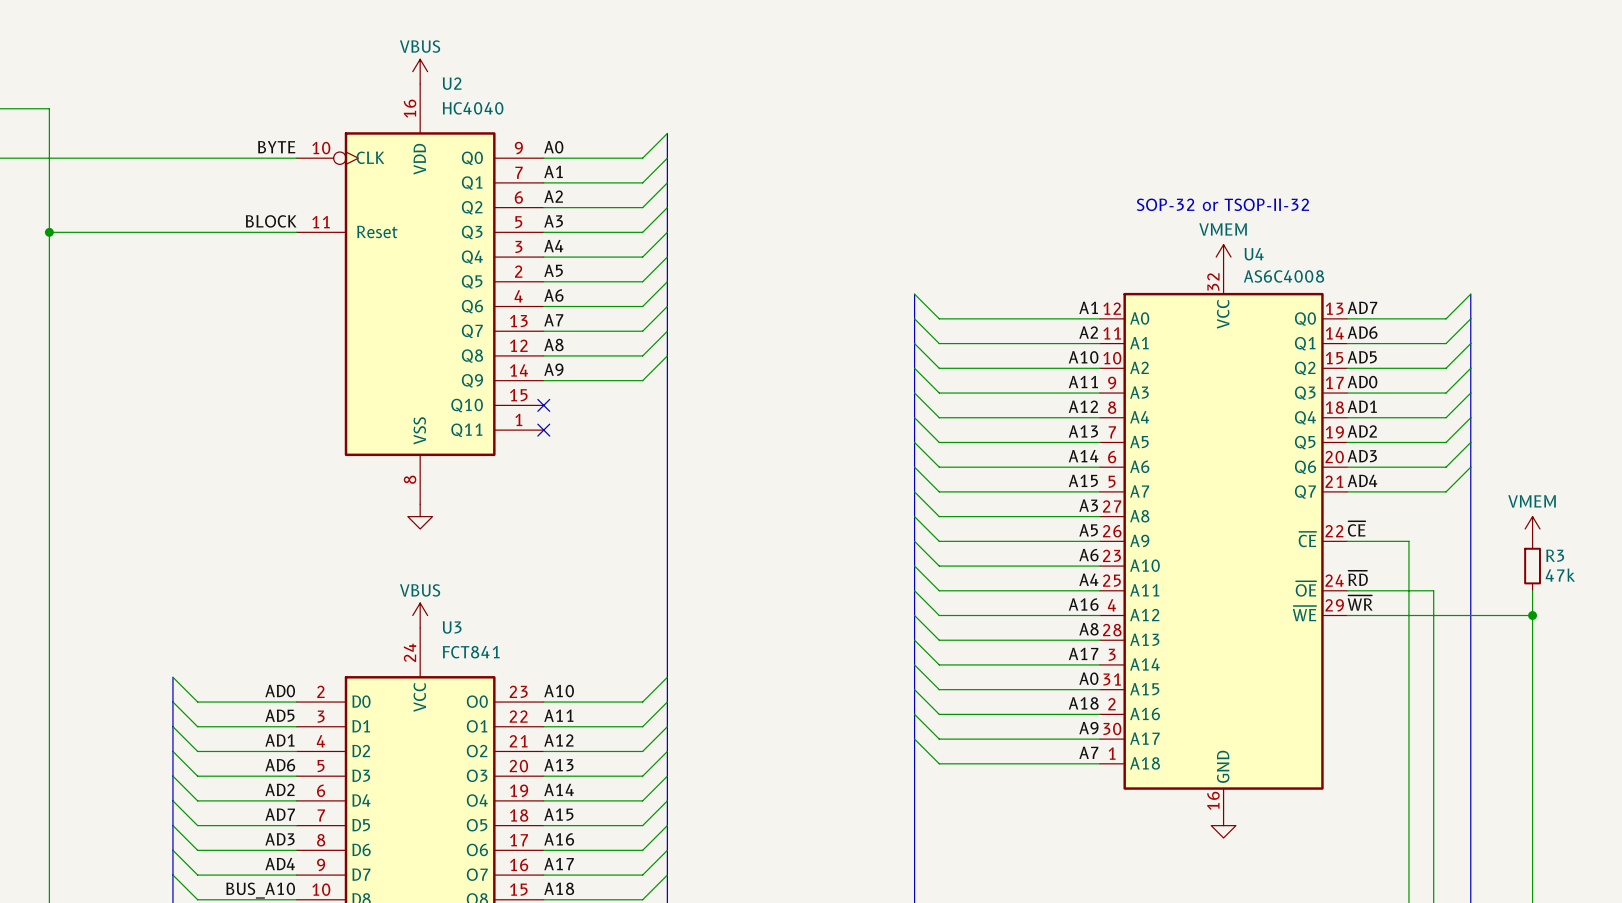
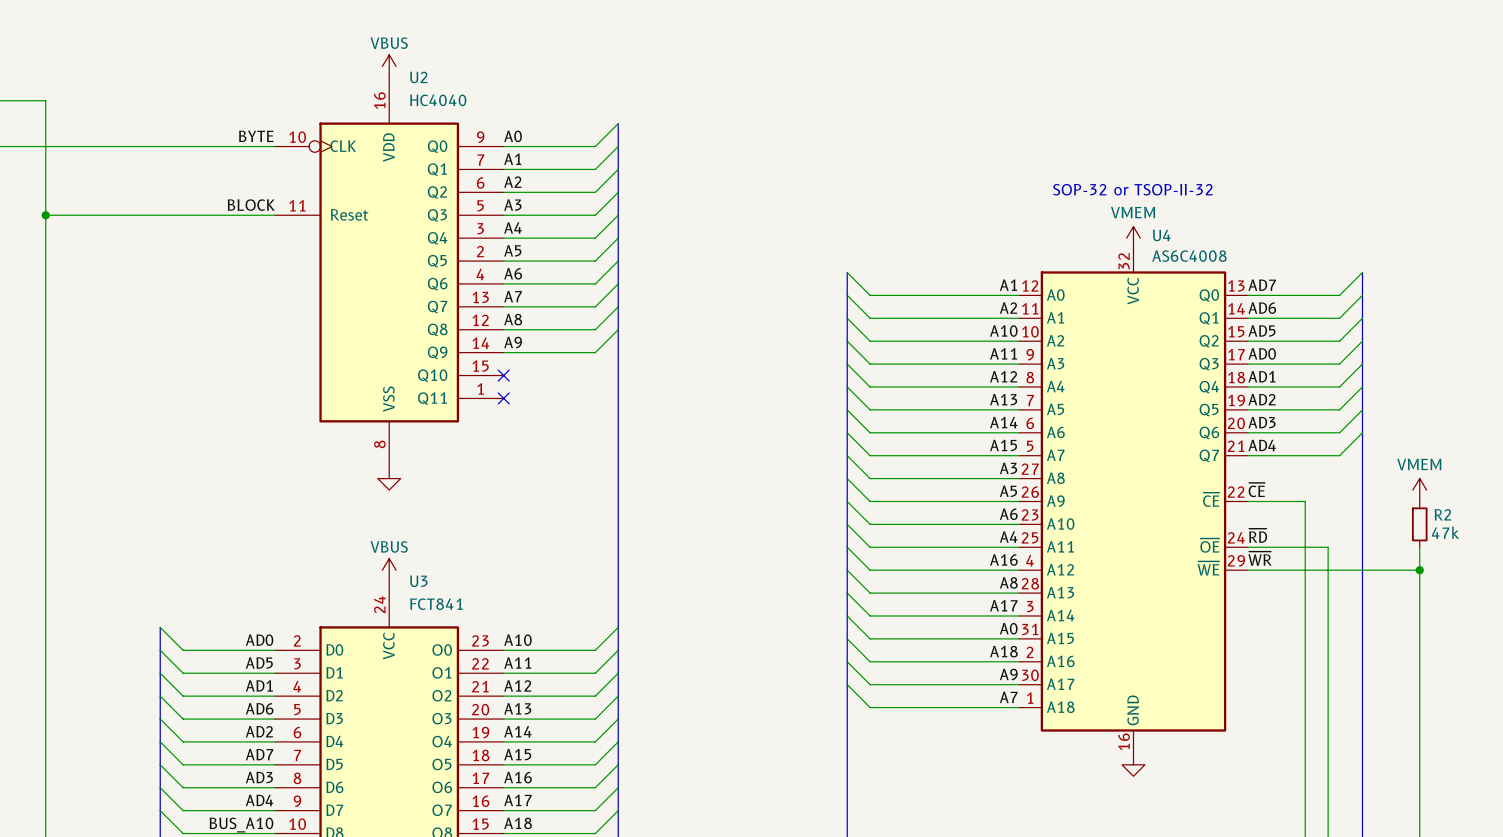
R3 name: R3 (1555, 555) -> R2 (1442, 514)

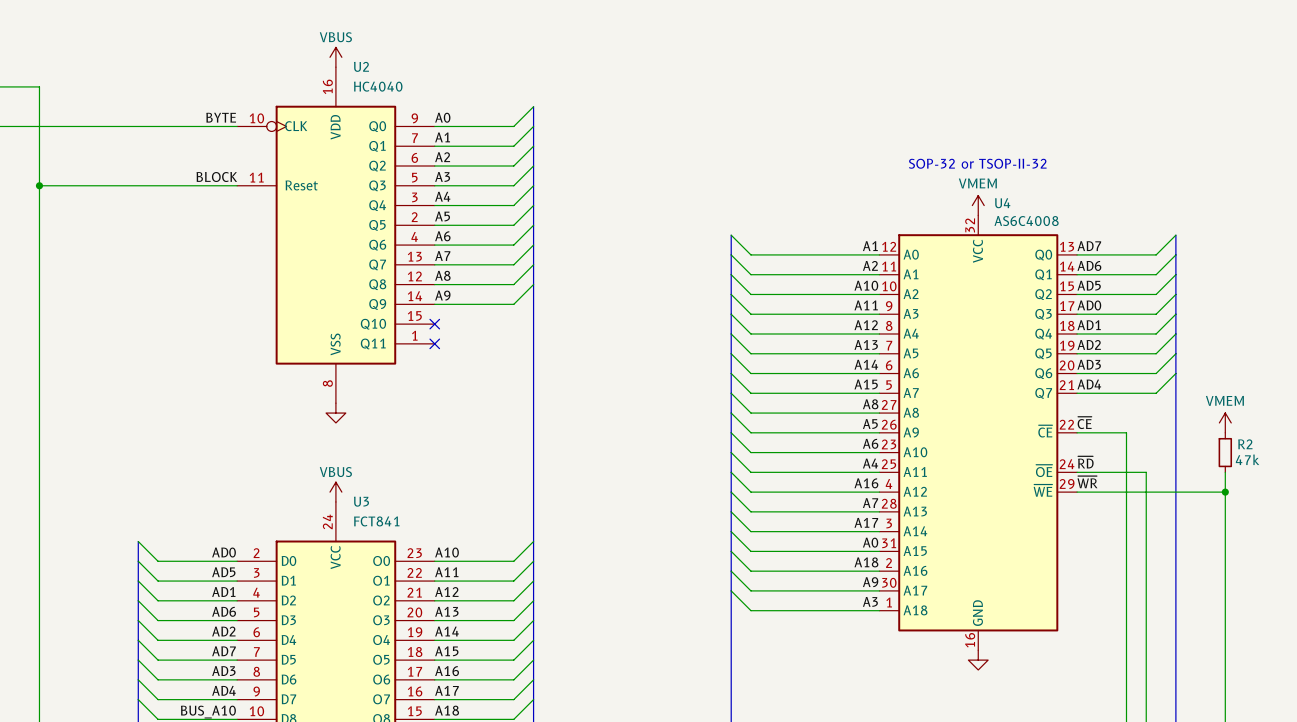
label: A3 (1008, 468) -> A8 (870, 404)
label: A8 (1008, 582) -> A7 (870, 503)
label: A7 (1008, 697) -> A3 (870, 601)

